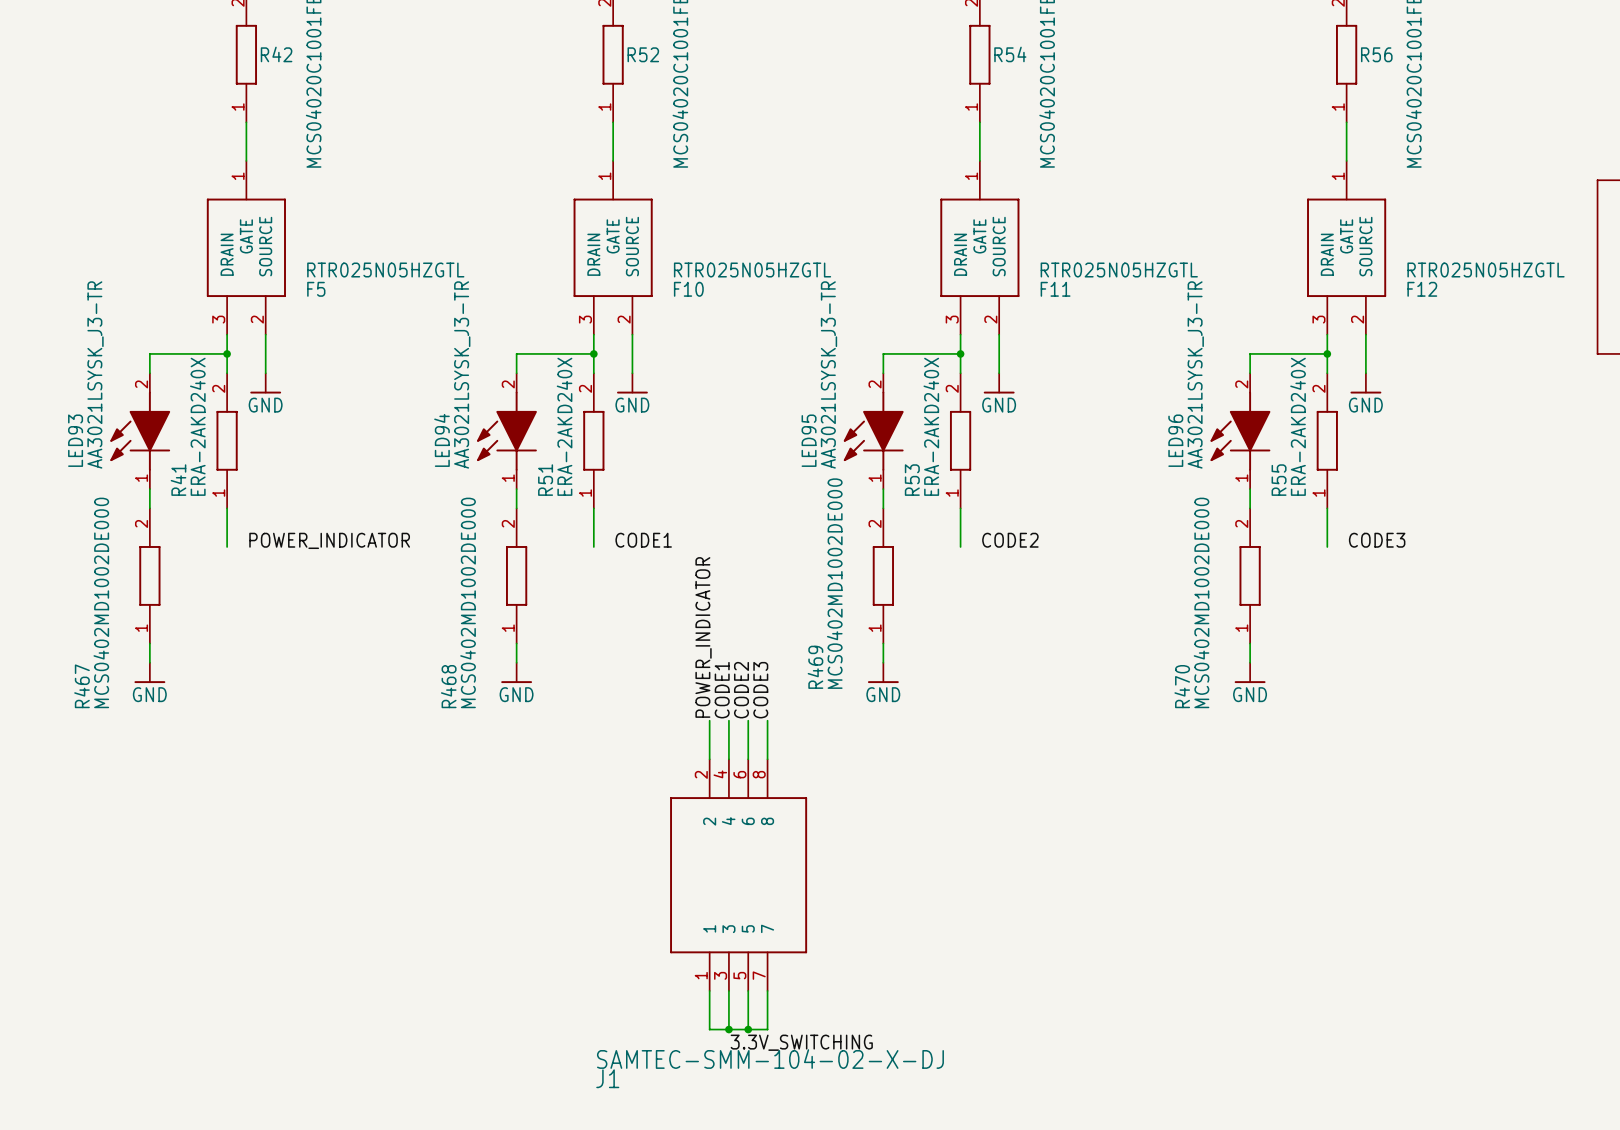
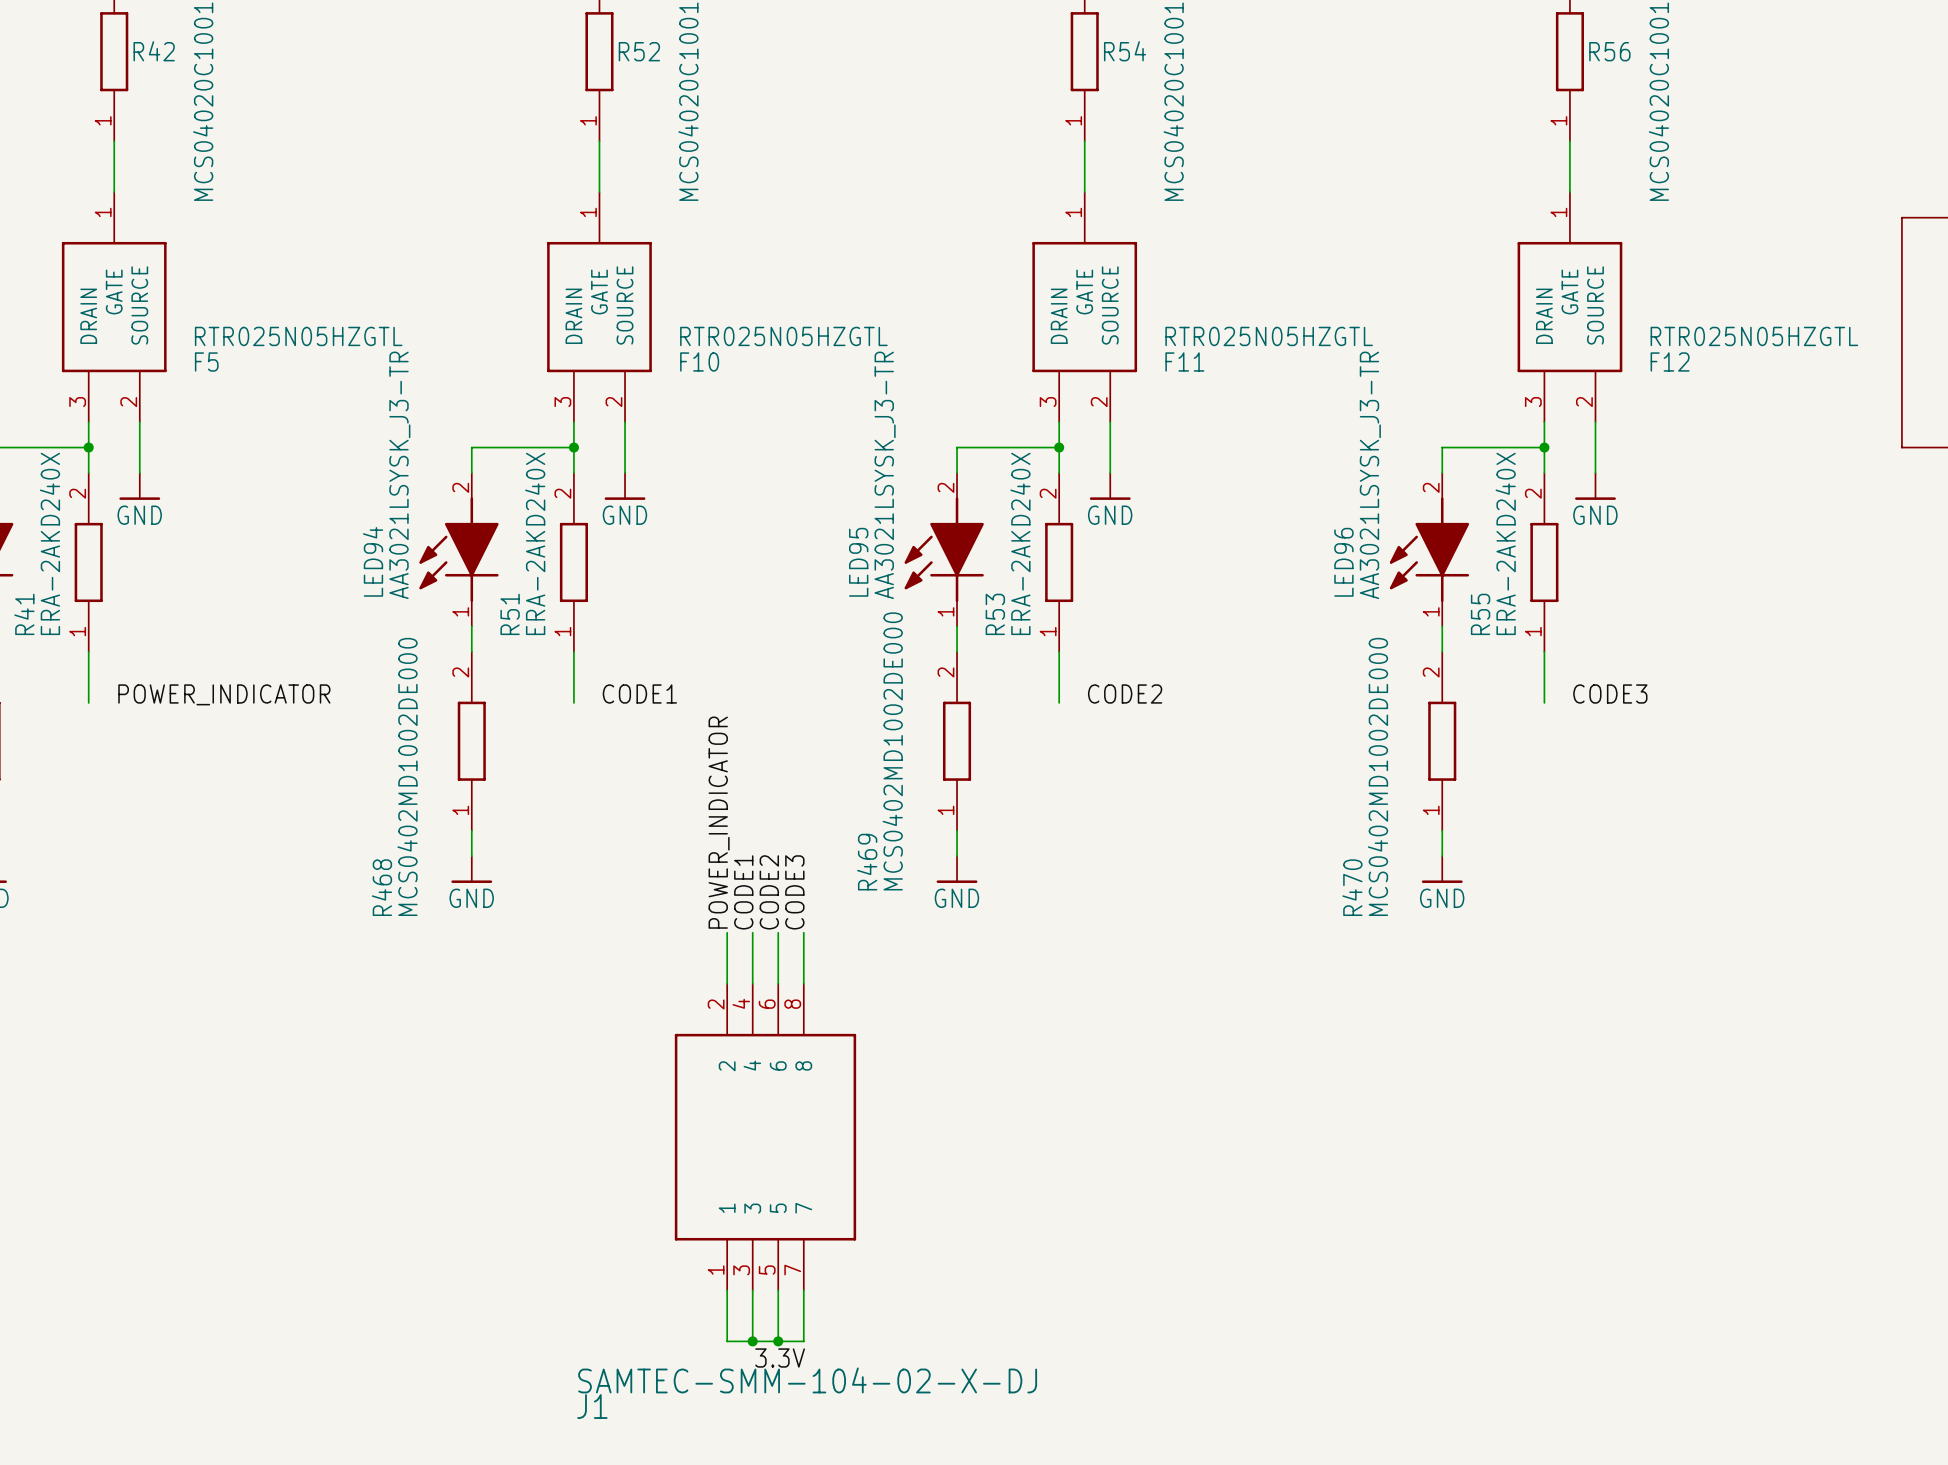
label: 3.3V_SWITCHING (801, 1042) -> 3.3V (780, 1358)

